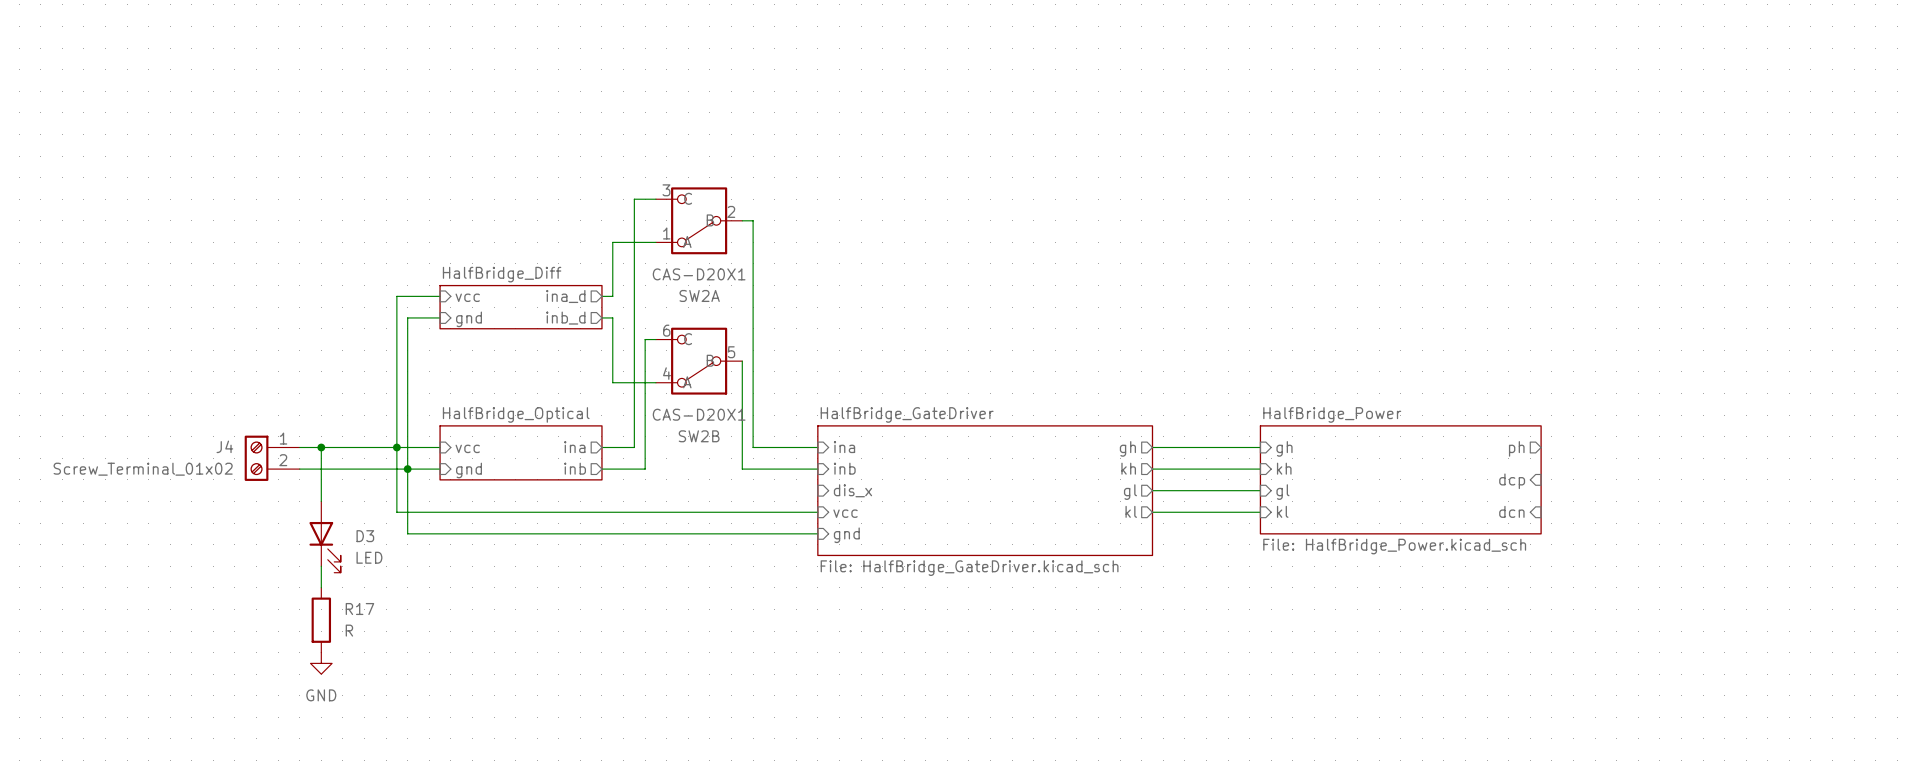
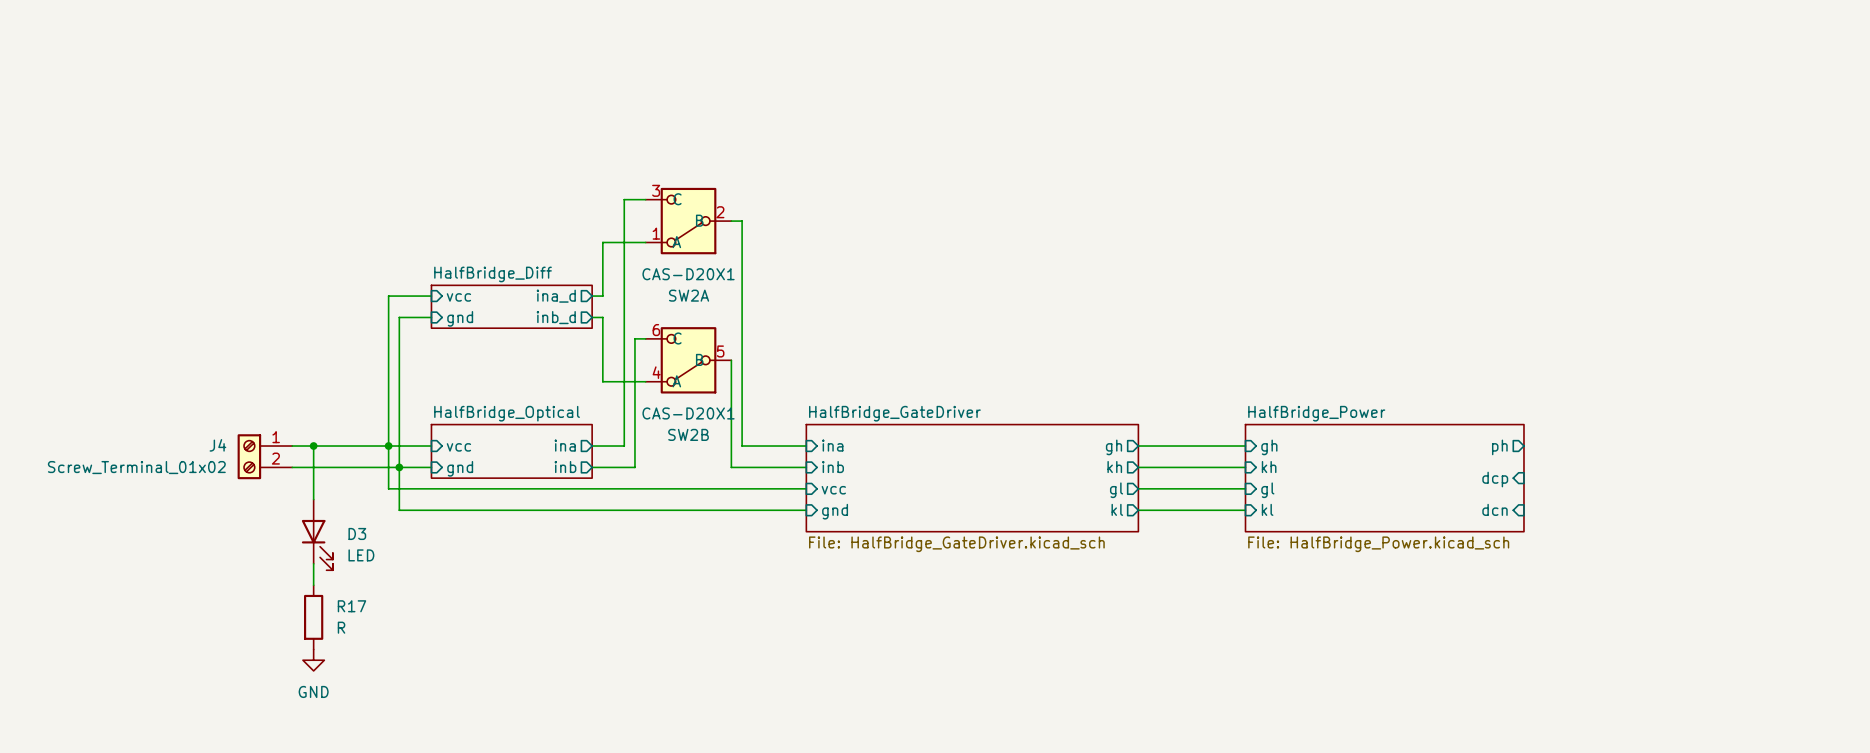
sheet HalfBridge_GateDriver: none -> File: HalfBridge_GateDriver.kicad_sch (972, 478)
wire: (396, 490) (396, 512) (407, 512) (407, 533) (817, 533) -> (388, 488) (806, 488)
sheet pin: dis_x (852, 490) -> vcc (833, 490)
sheet HalfBridge_GateDriver: File: HalfBridge_GateDriver.kicad_sch (985, 490) -> none
sheet pin: vcc (845, 513) -> gnd (835, 511)
sheet pin: gnd (846, 535) -> none

